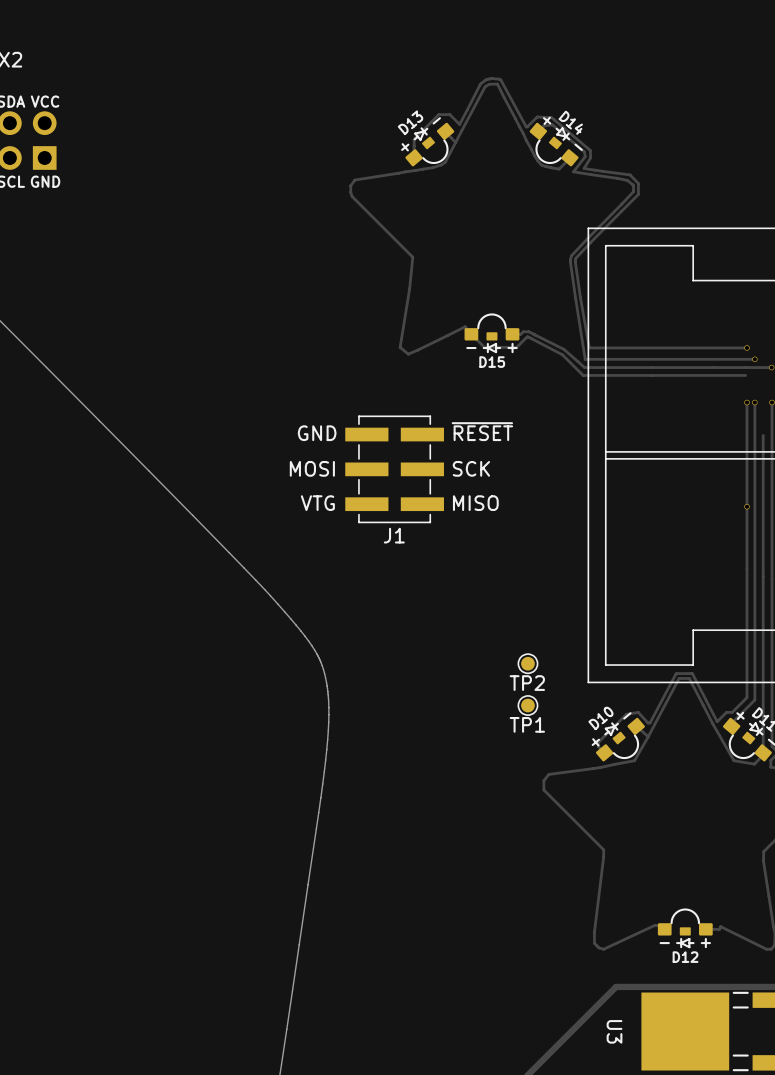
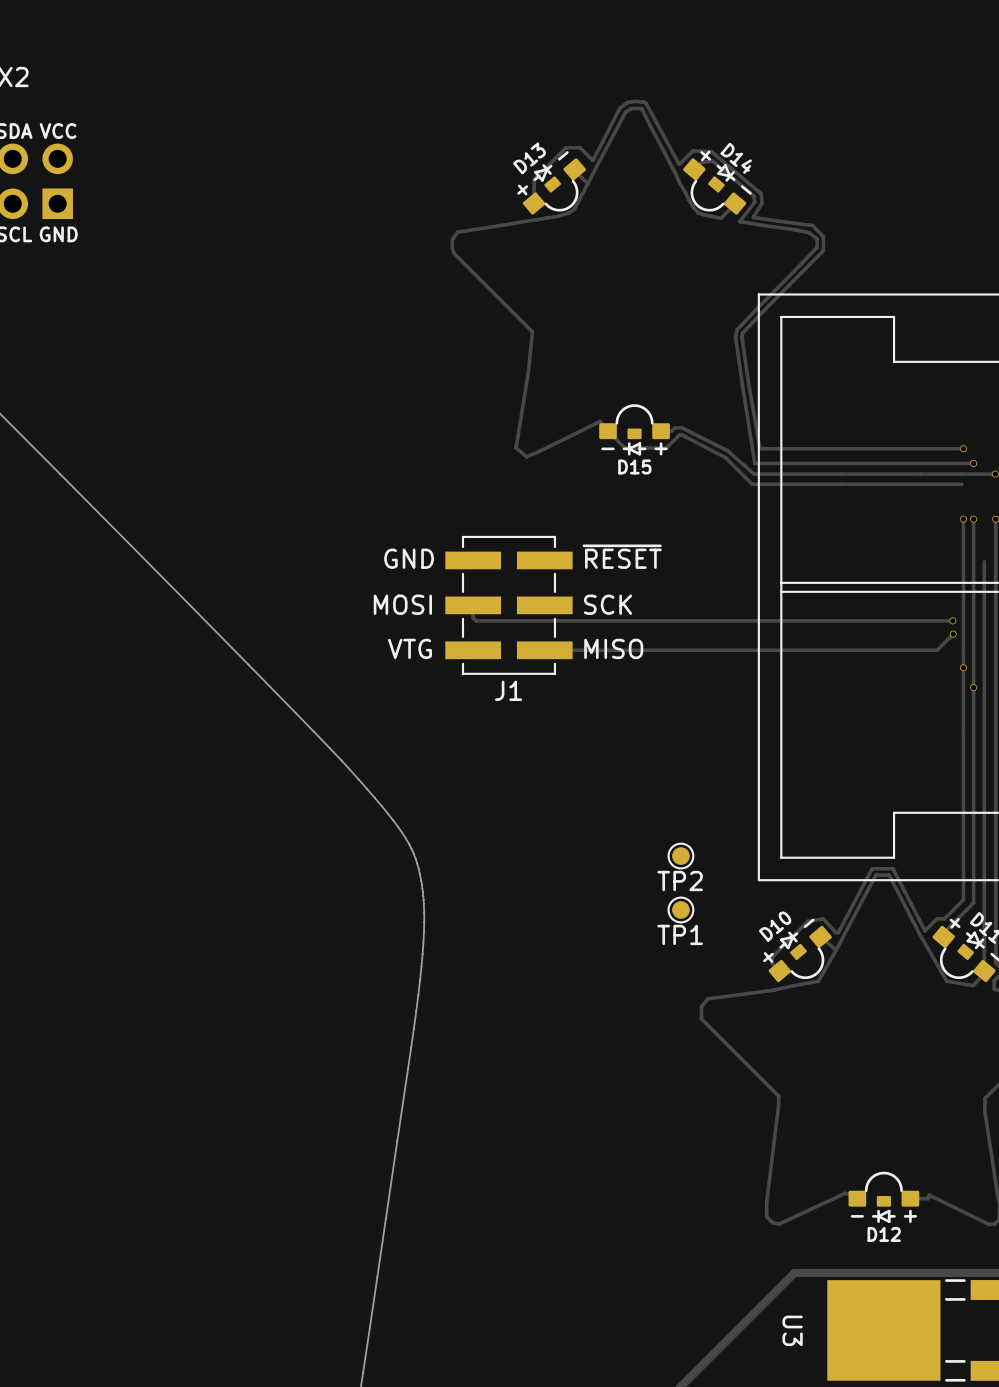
track: none -> (473, 605) (473, 617) (476, 620) (952, 620)
via: none -> (952, 620)
track: none -> (953, 634) (937, 650) (544, 650)
via: none -> (953, 634)
via: (746, 506) -> none
via: none -> (963, 667)
via: none -> (973, 687)

